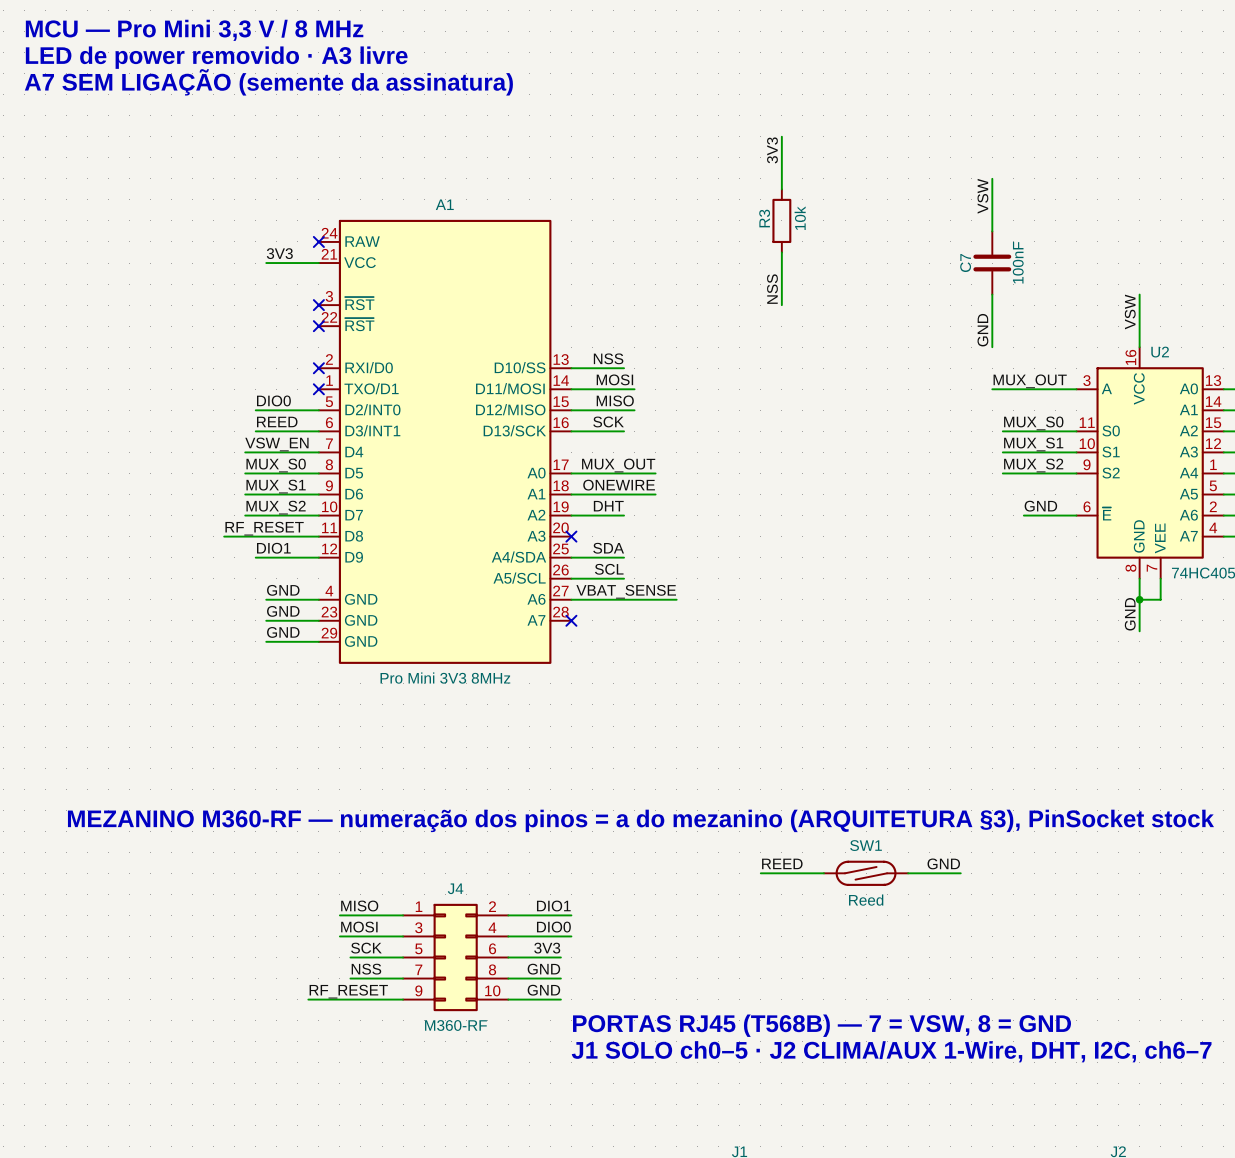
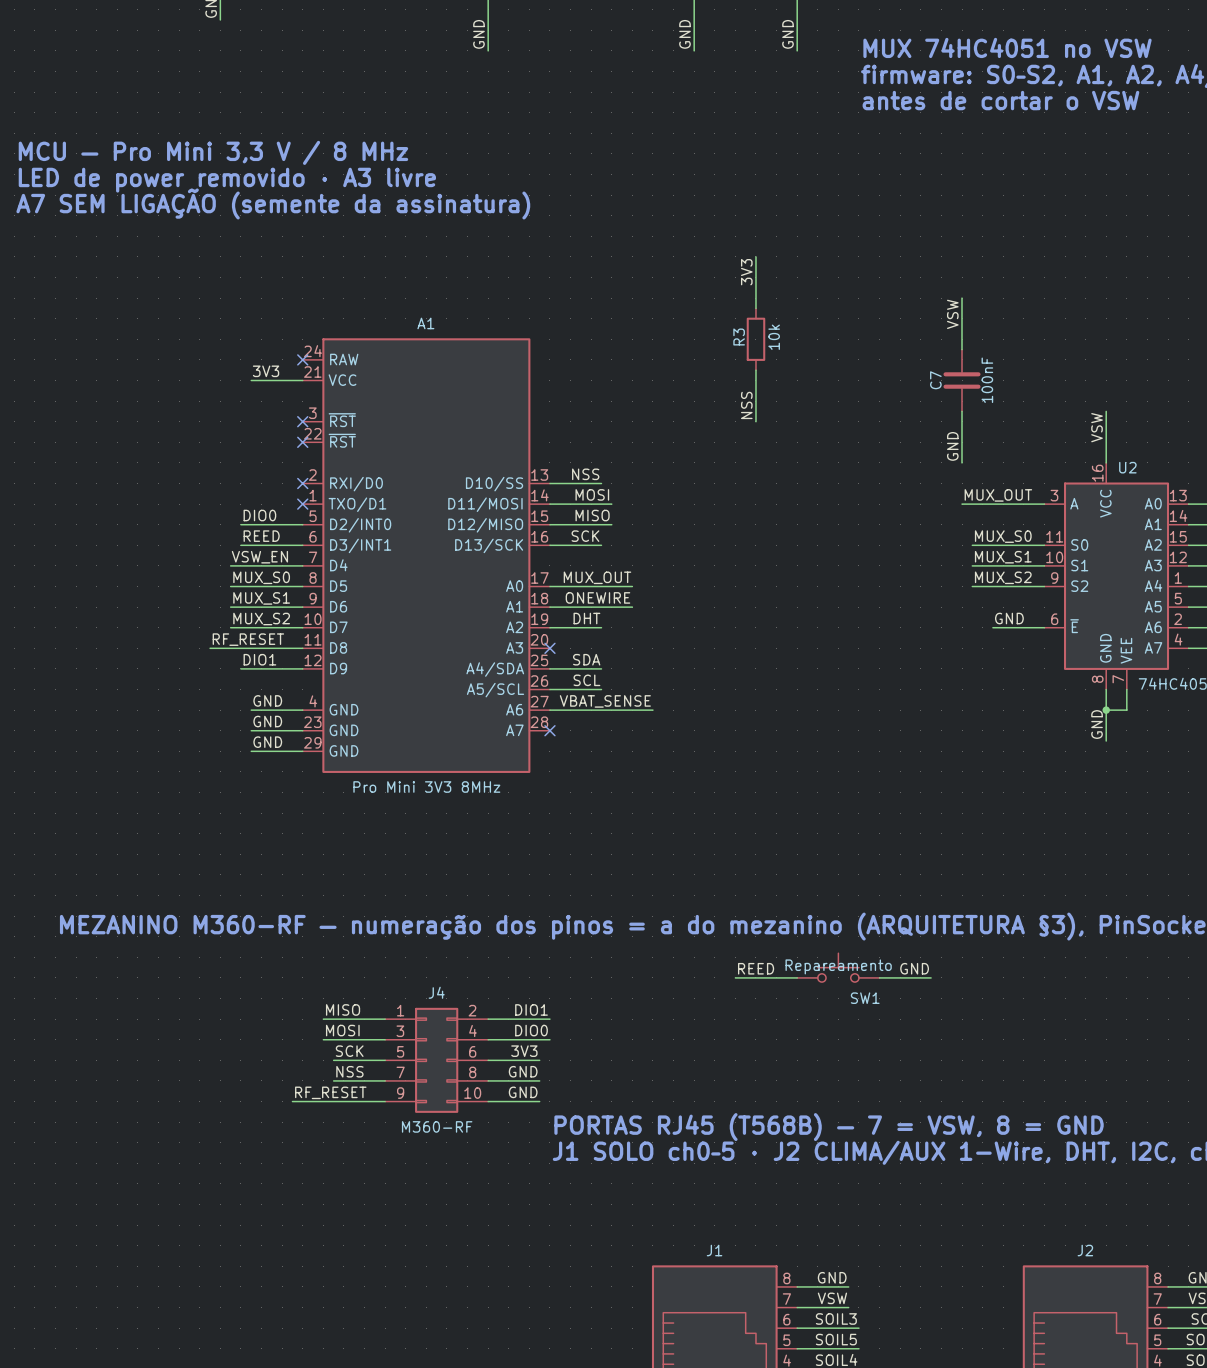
SW1 name position: SW1 (866, 845) -> SW1 (865, 998)
SW1 symbol: [823, 860, 909, 886] -> [797, 953, 880, 983]
SW1 value: Reed (866, 900) -> Repareamento (838, 966)

